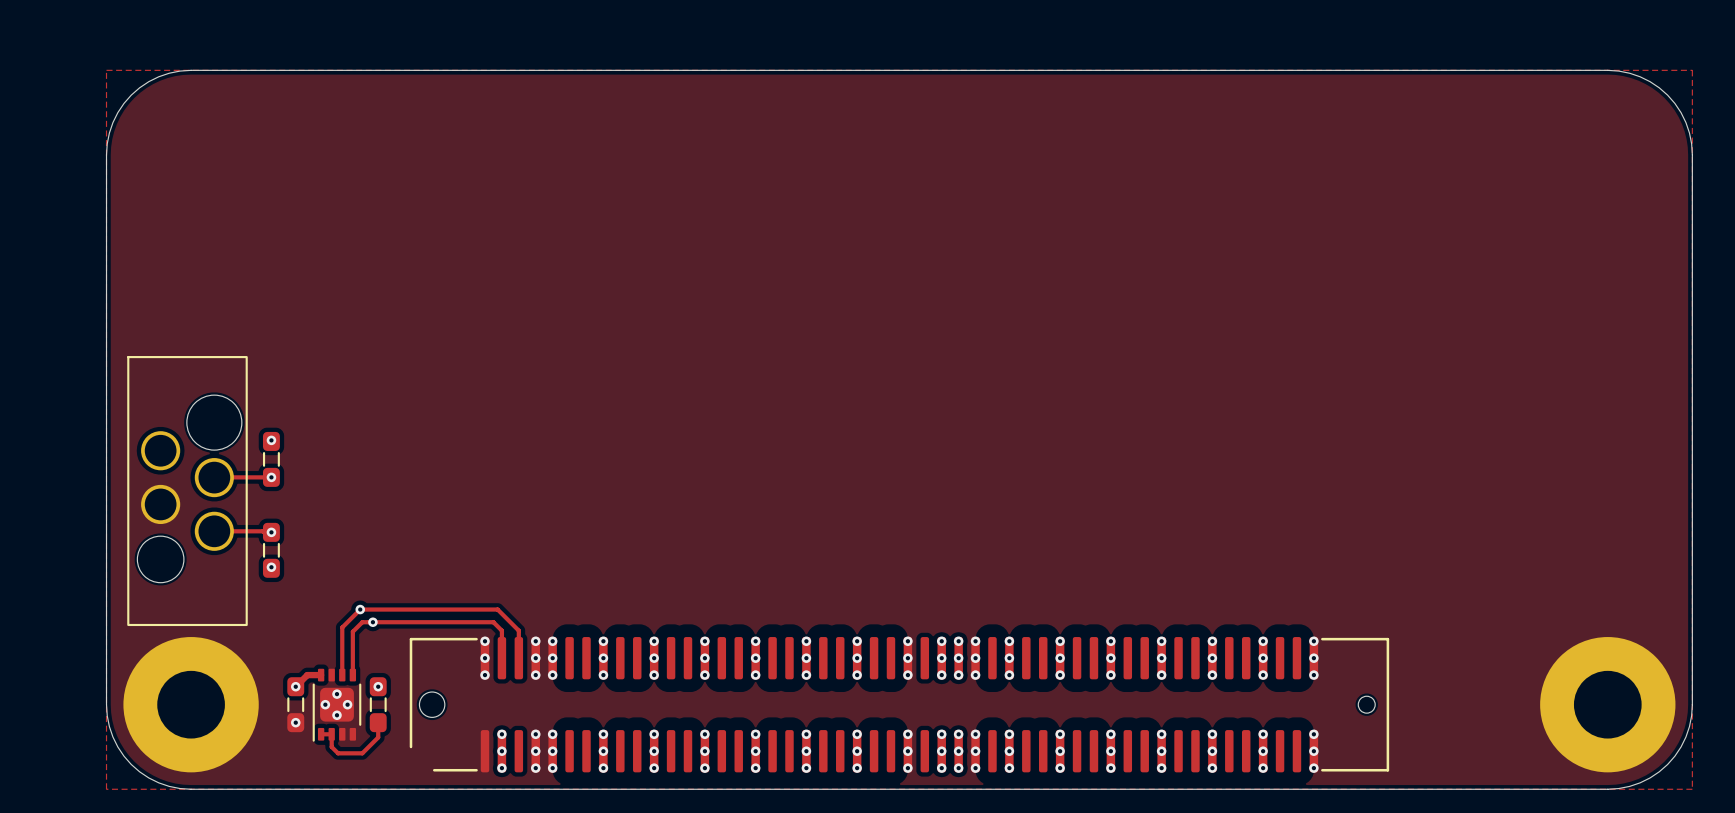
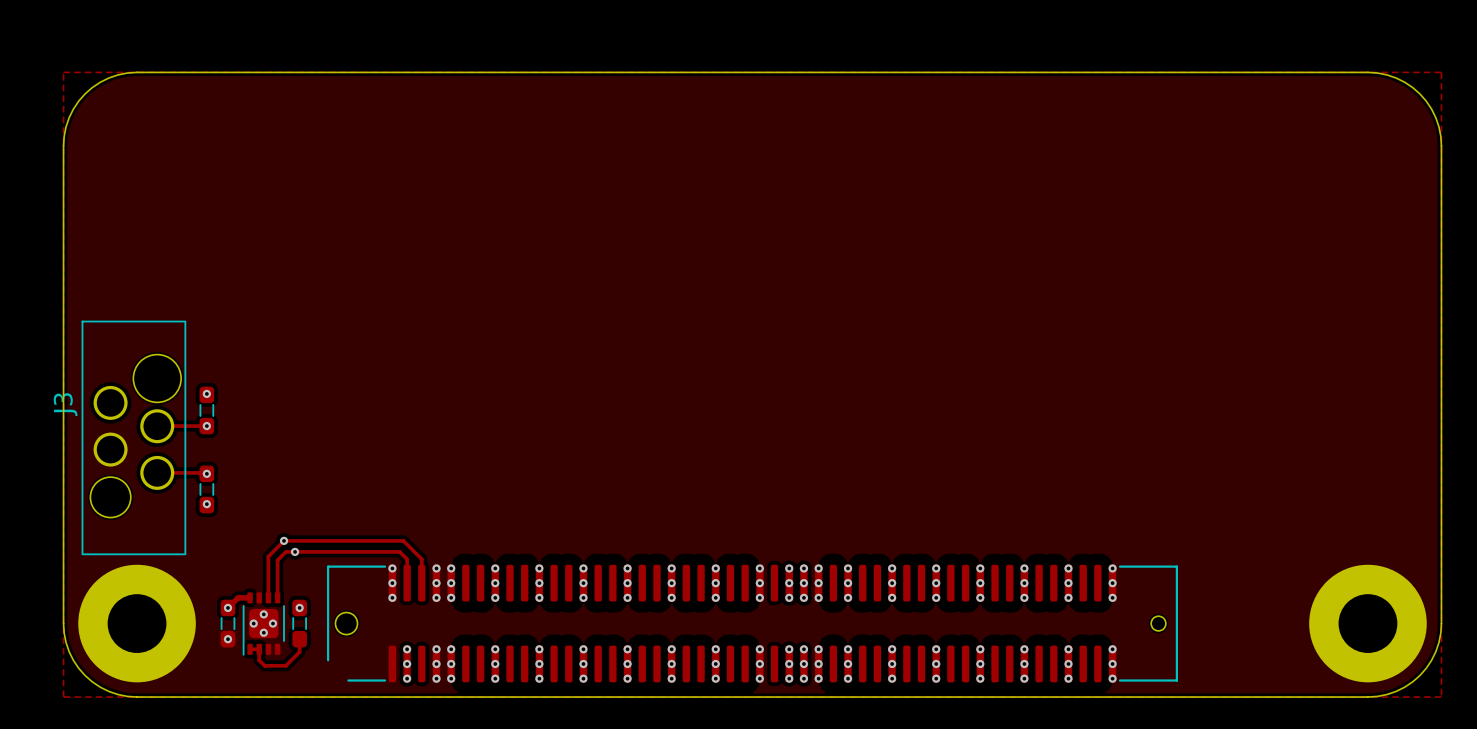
J3 name: none -> J3 (65, 404)

